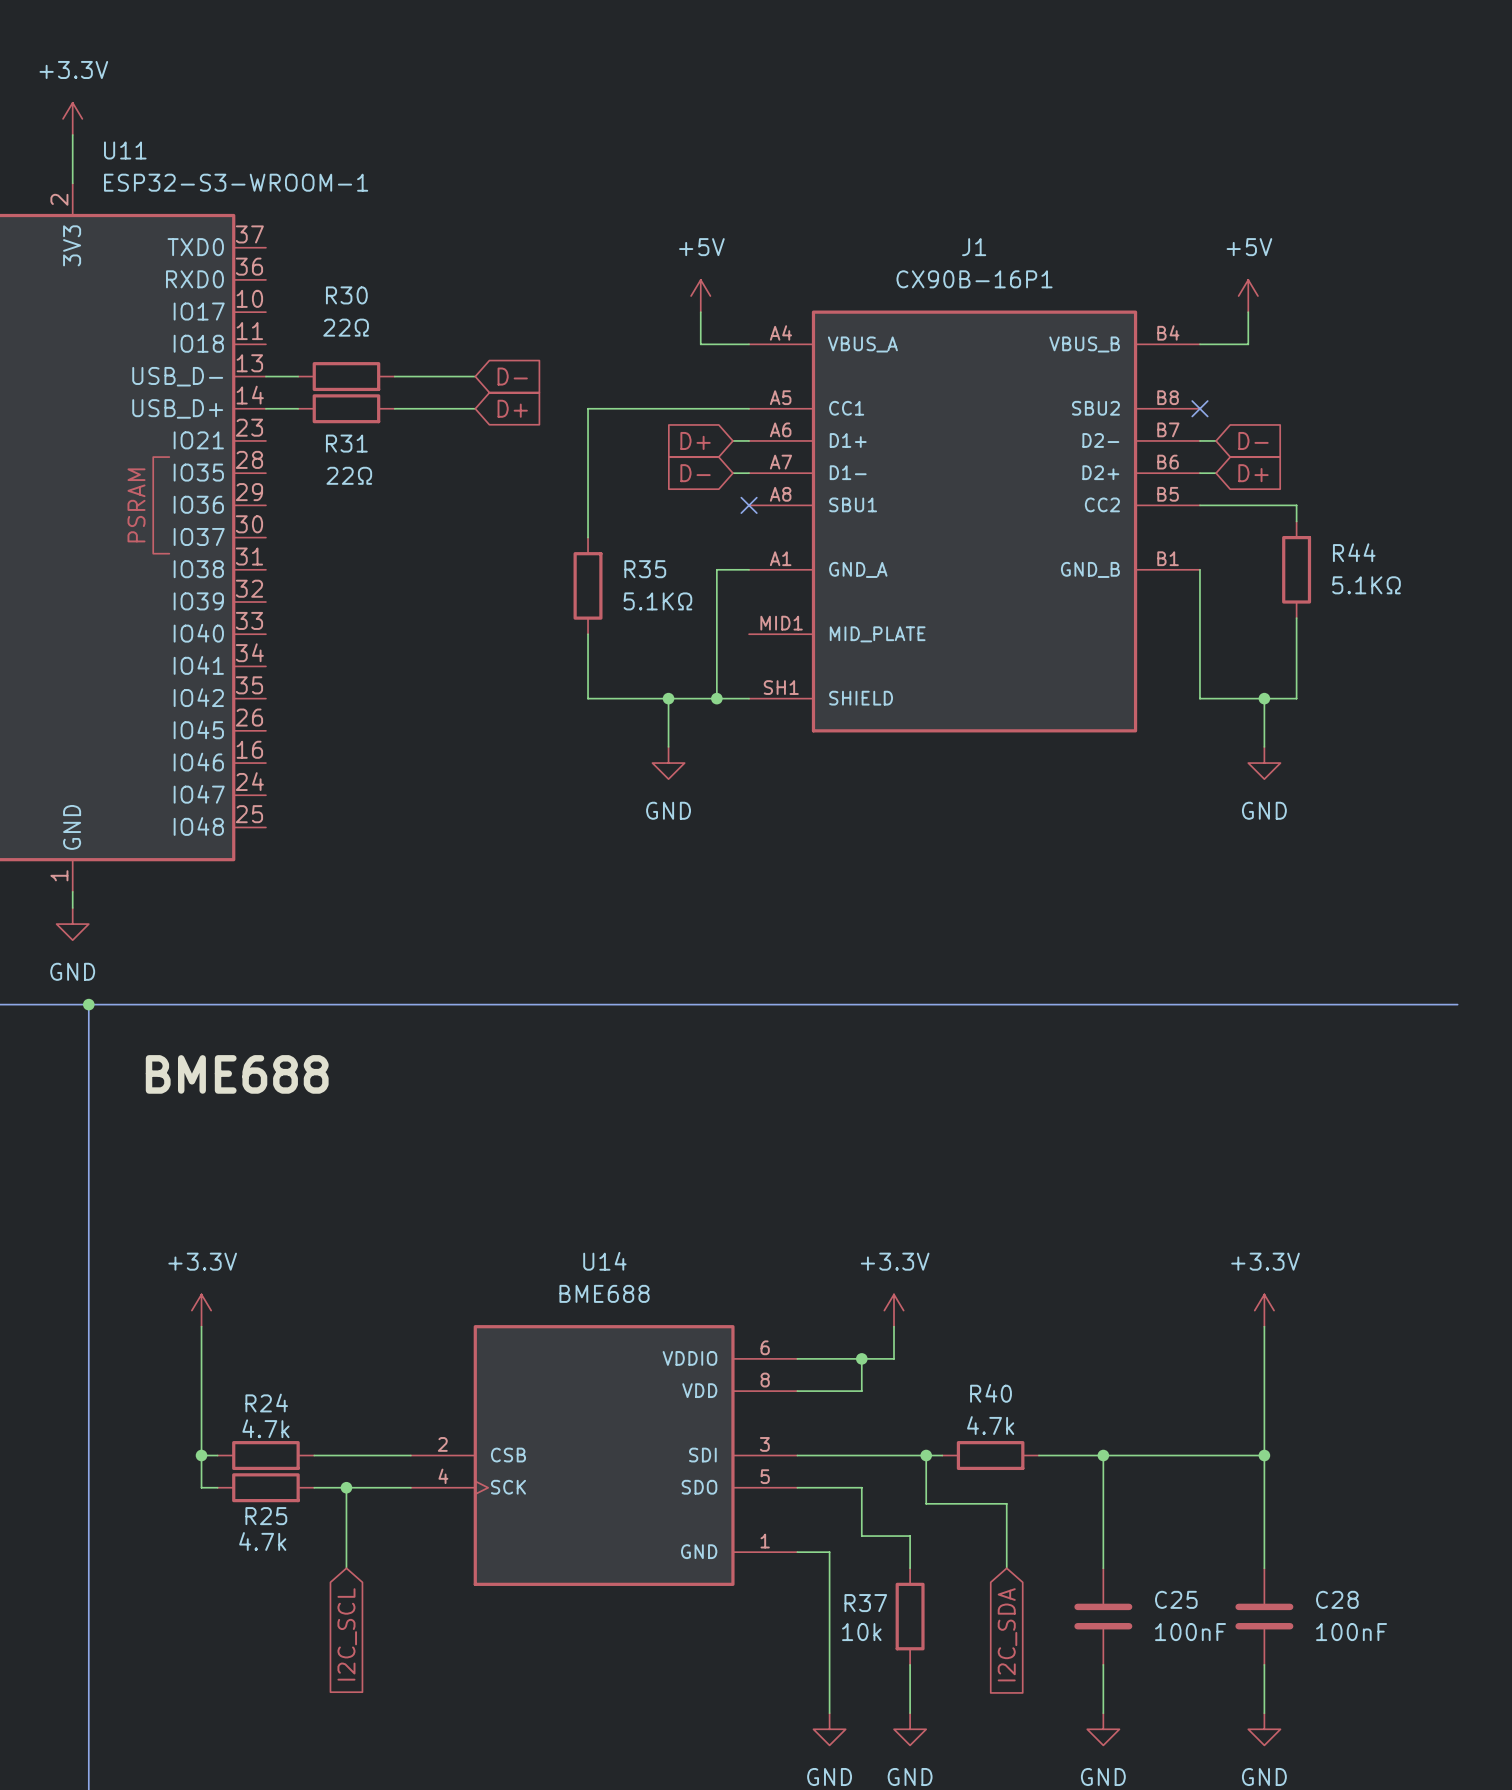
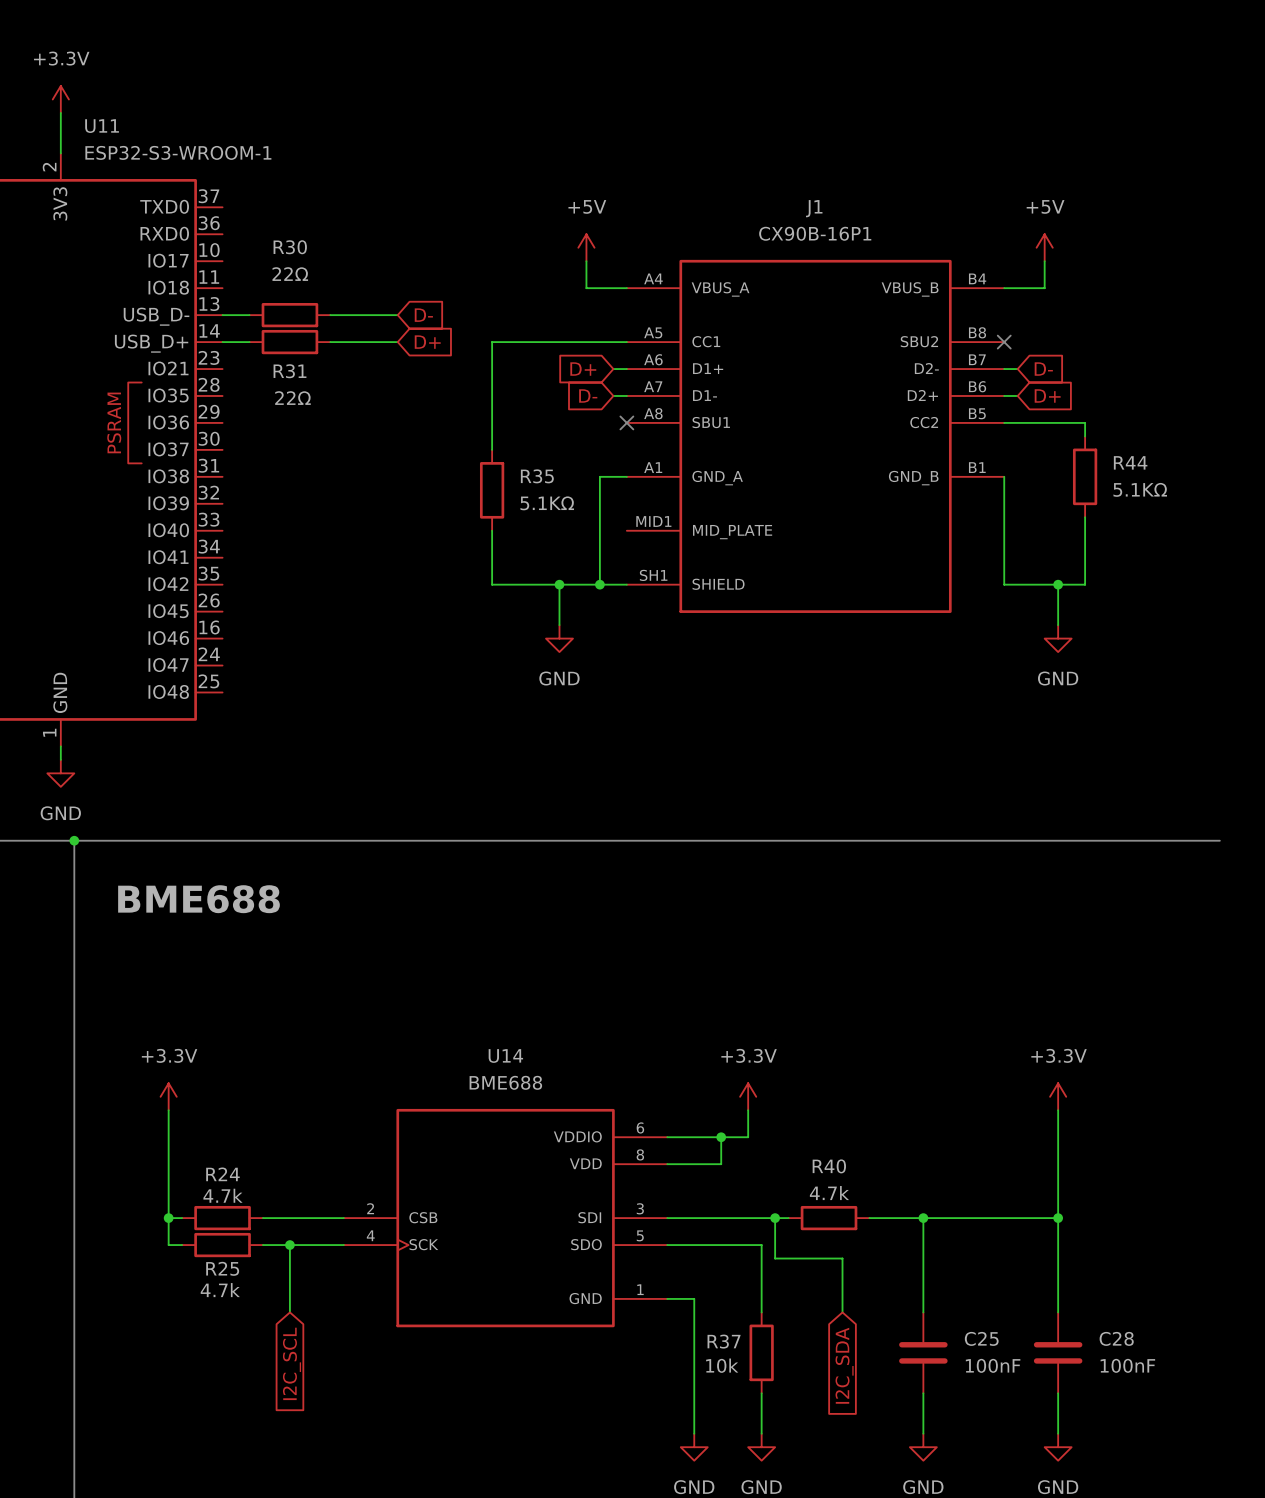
wire: (861, 1487) (861, 1536) (910, 1536) -> (721, 1245) (761, 1245) (761, 1285)

